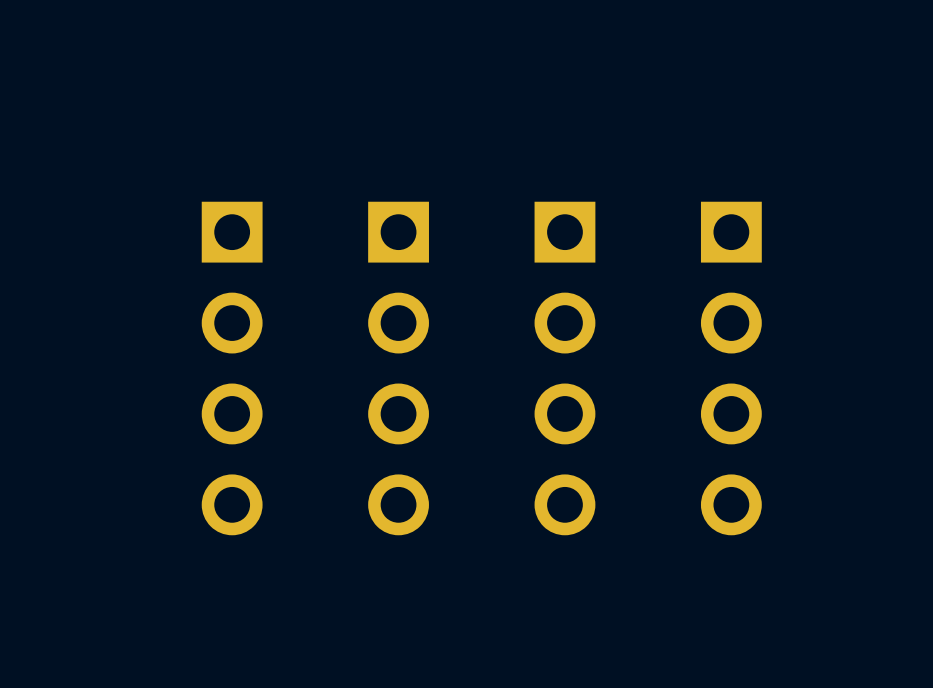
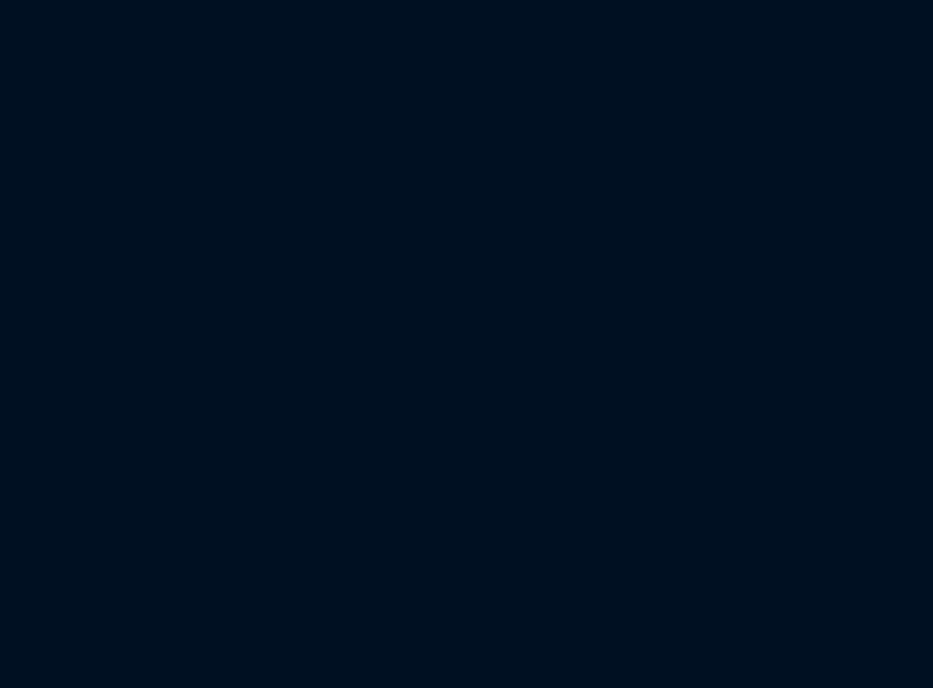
part: (232, 368) -> none
part: (398, 368) -> none
part: (564, 368) -> none
part: (731, 368) -> none

